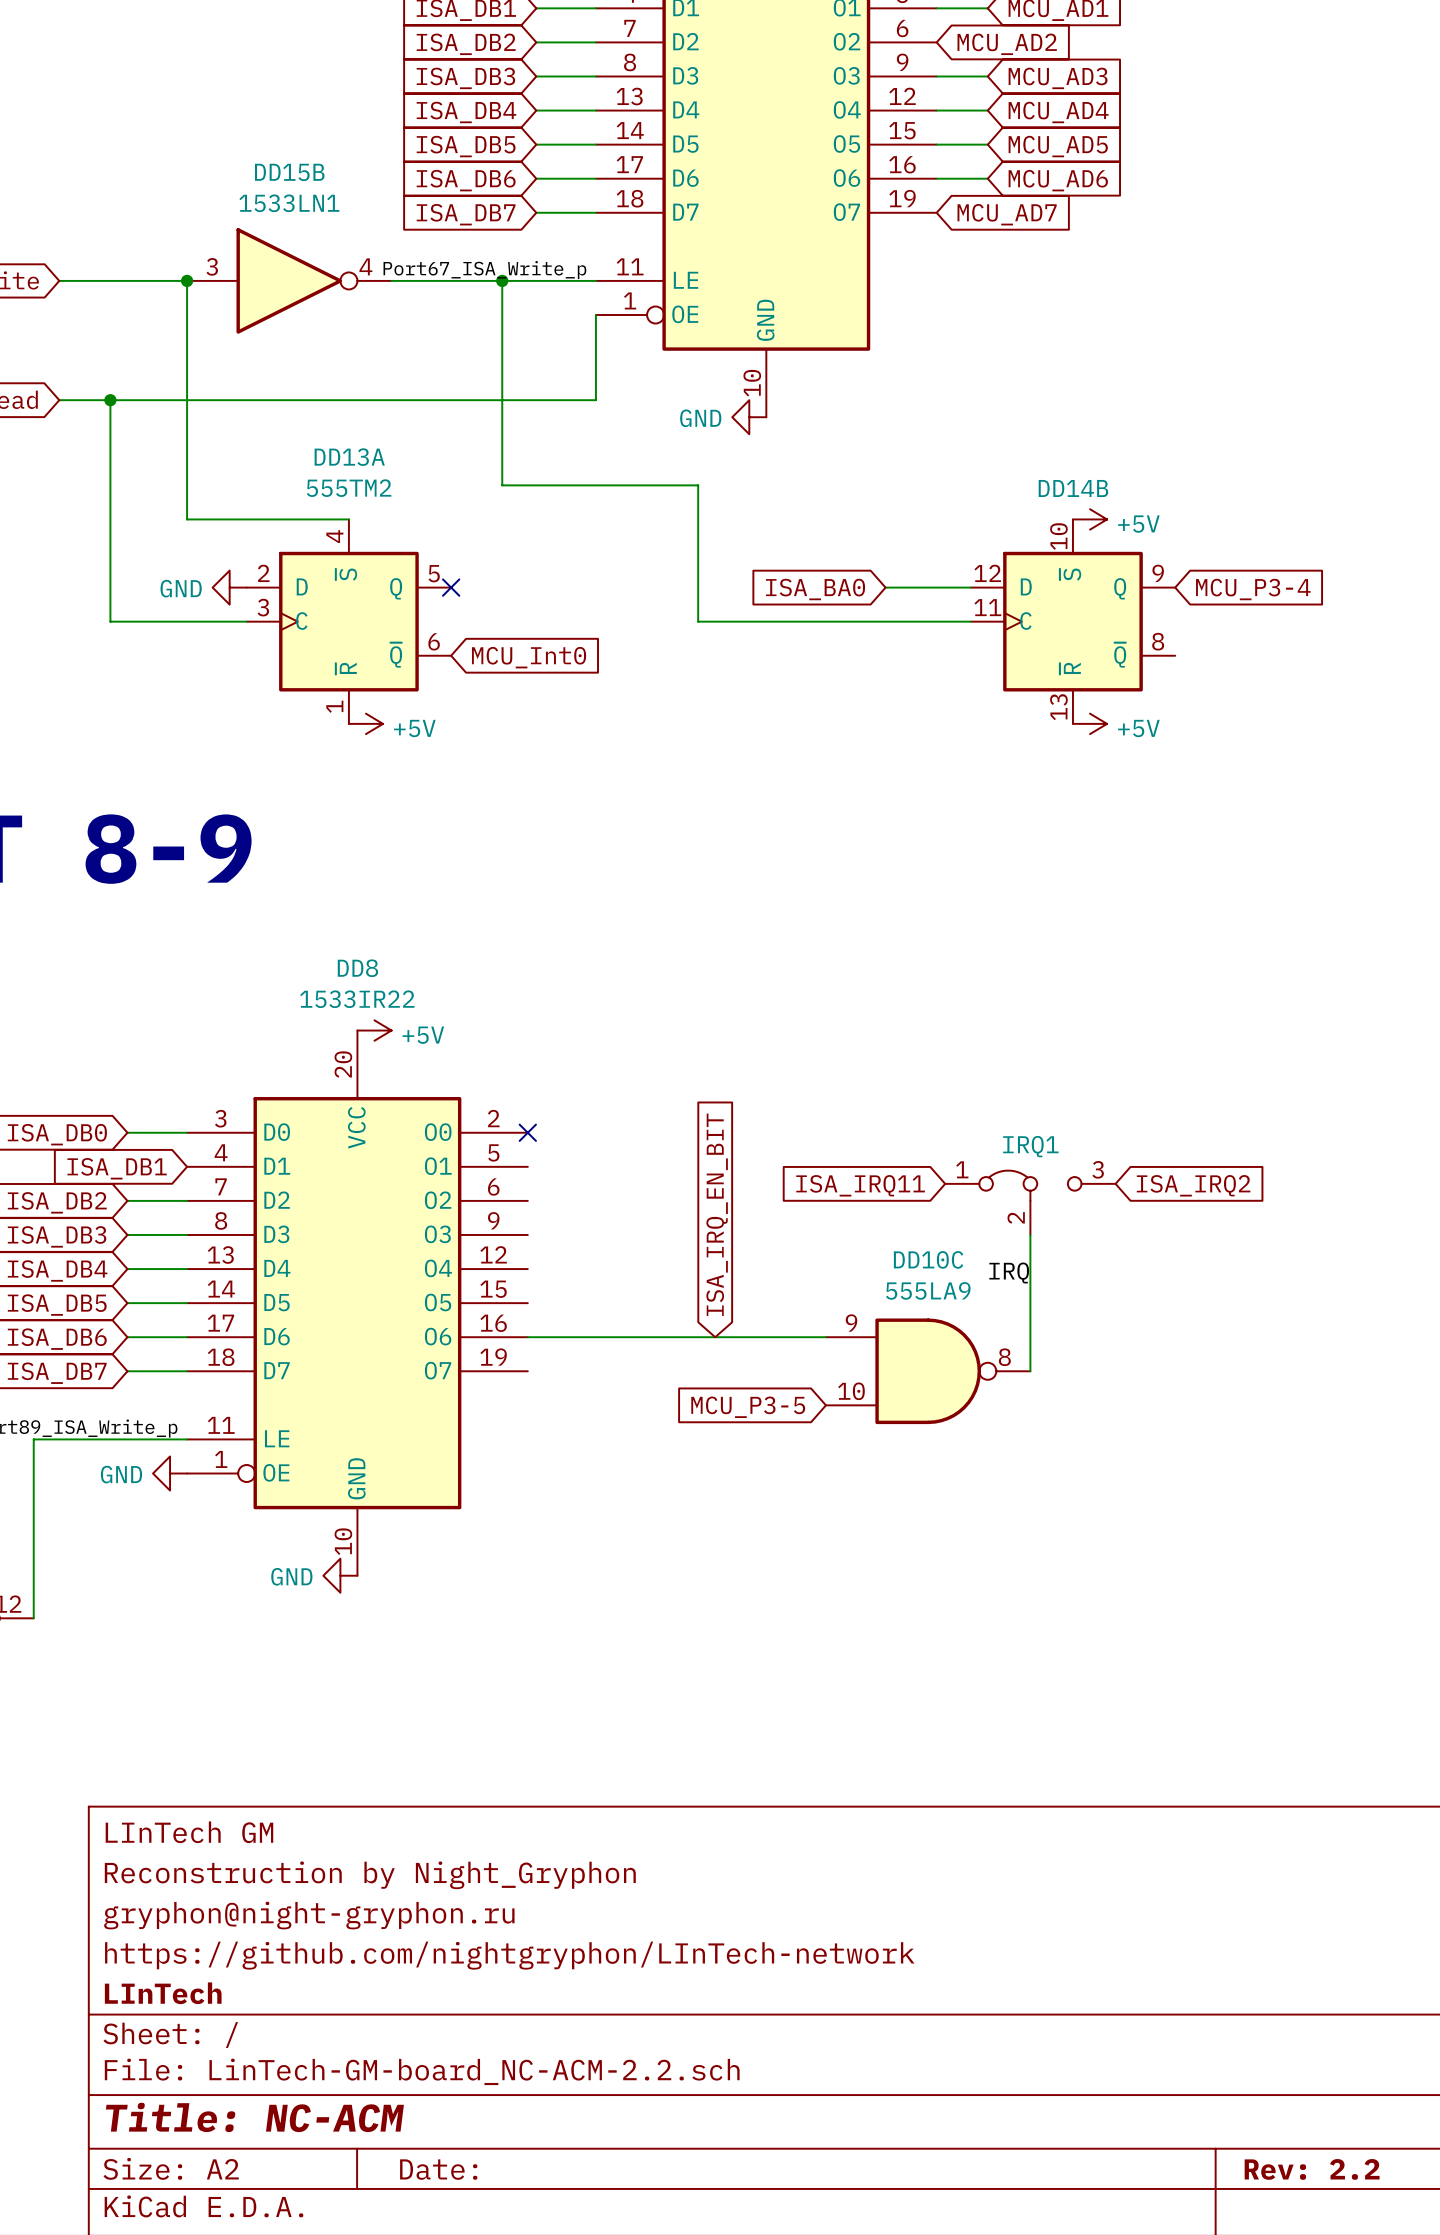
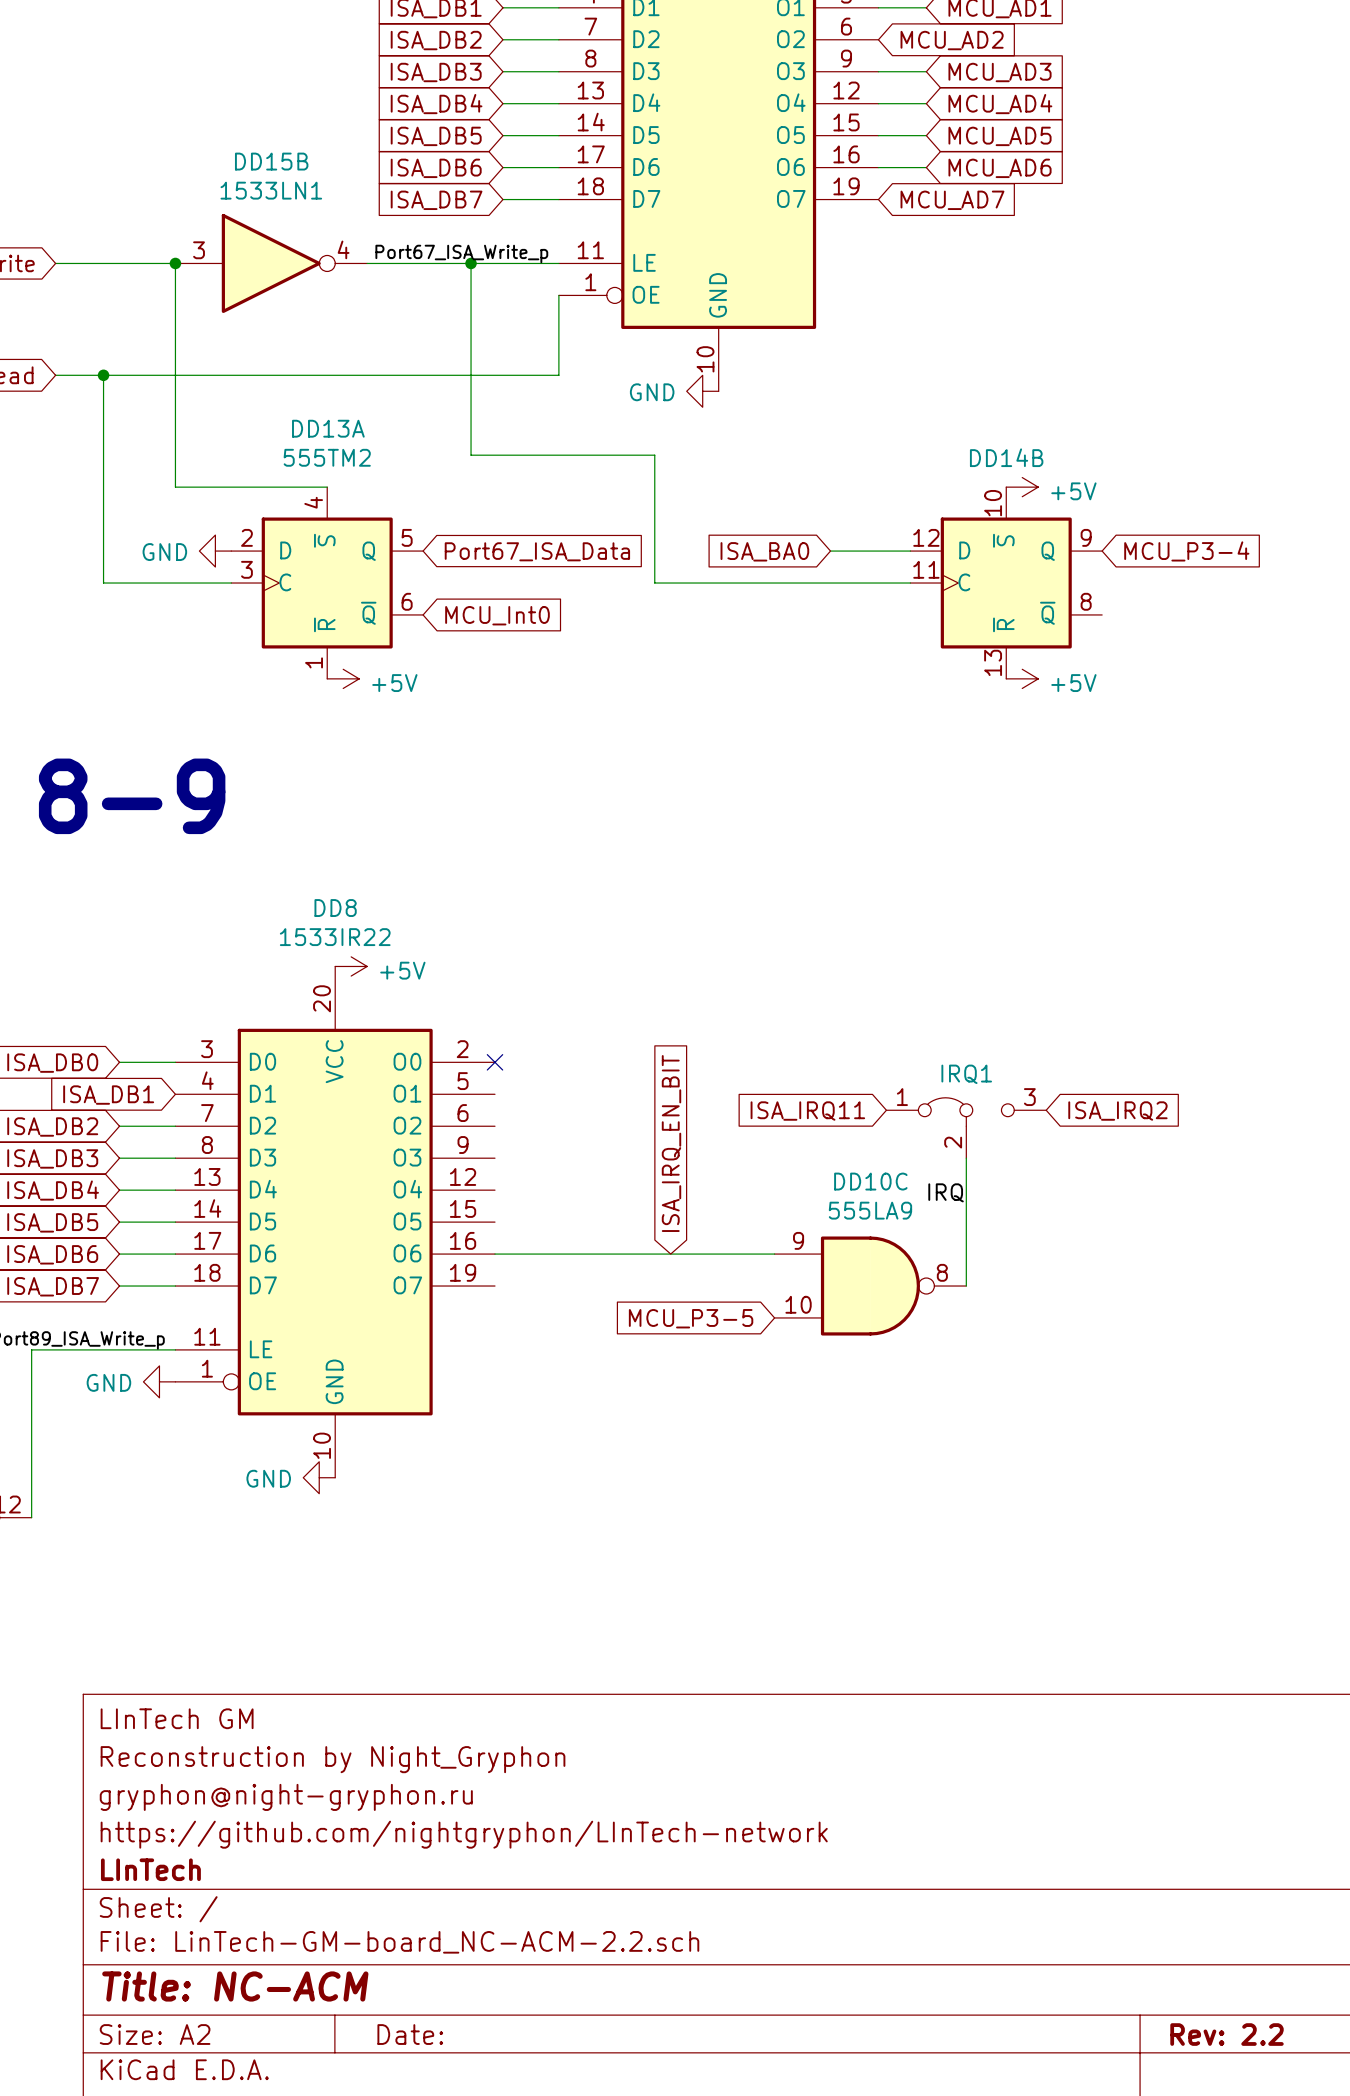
no-connect mark: (451, 587) -> none
global label: none -> Port67_ISA_Data (537, 551)

